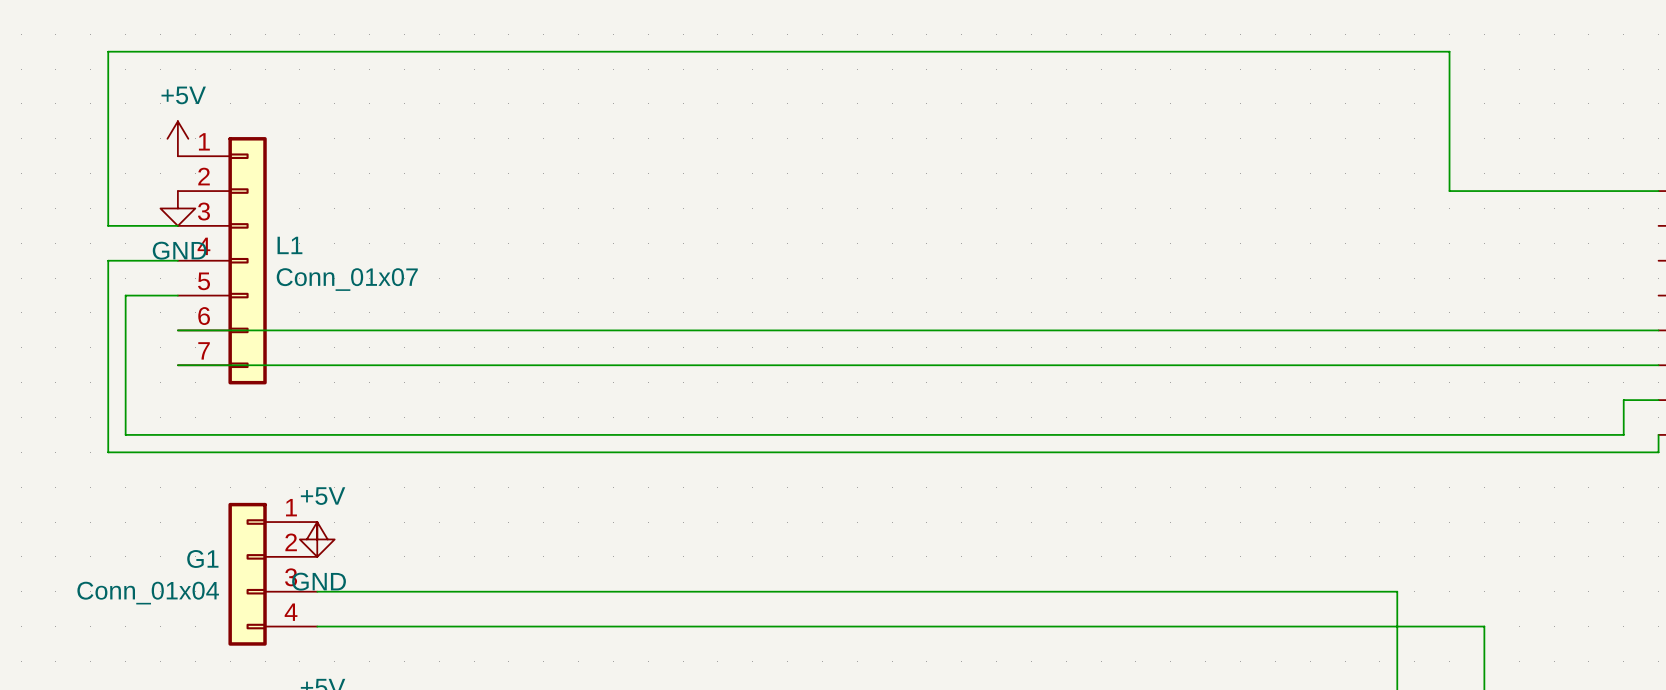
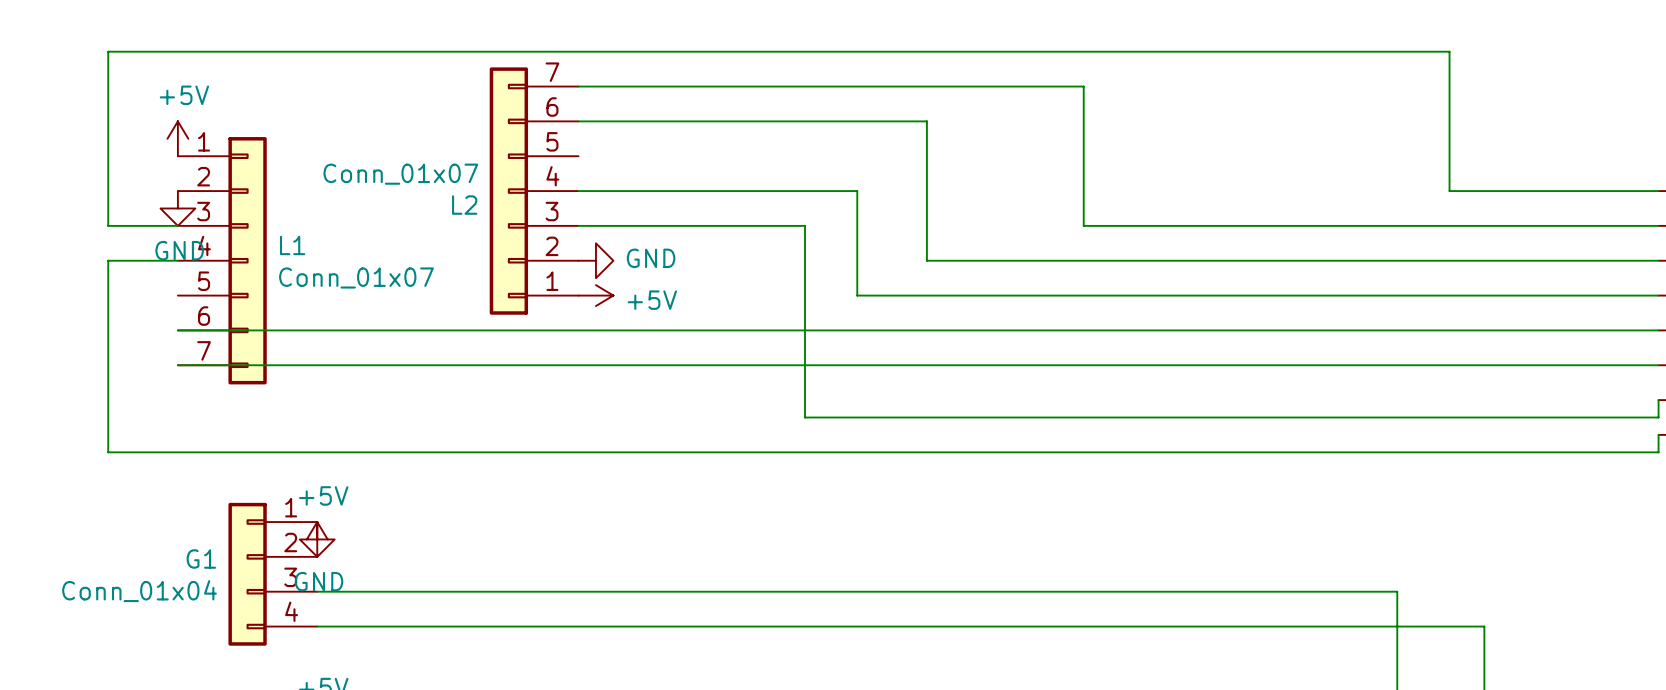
wire: none -> (578, 86) (1083, 86) (1083, 225) (1658, 225)
wire: none -> (578, 121) (926, 121) (926, 260) (1658, 260)
L2: none -> Conn_01x07 (534, 191)
wire: none -> (578, 191) (857, 191) (857, 295) (1658, 295)
power symbol: none -> GND (595, 260)
wire: (177, 295) (125, 295) (125, 434) (1623, 434) (1623, 400) (1658, 400) -> (578, 225) (805, 225) (805, 417) (1658, 417) (1658, 400)
power symbol: none -> +5V (595, 295)

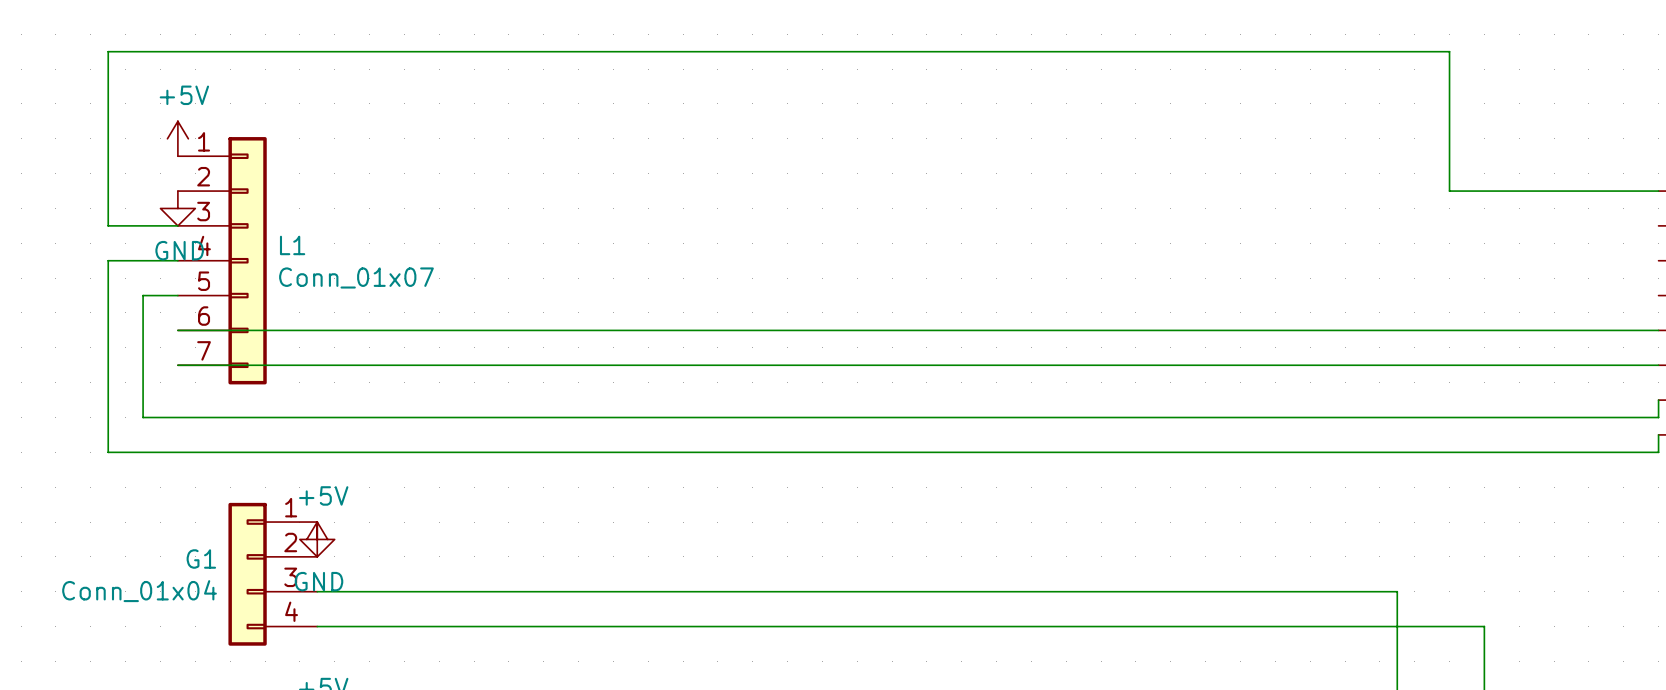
wire: (578, 86) (1083, 86) (1083, 225) (1658, 225) -> none
wire: (578, 121) (926, 121) (926, 260) (1658, 260) -> none
L2: Conn_01x07 (534, 191) -> none
wire: (578, 191) (857, 191) (857, 295) (1658, 295) -> none
wire: (578, 225) (805, 225) (805, 417) -> (177, 295) (143, 295) (143, 417) (805, 417)
power symbol: GND (595, 260) -> none
power symbol: +5V (595, 295) -> none

